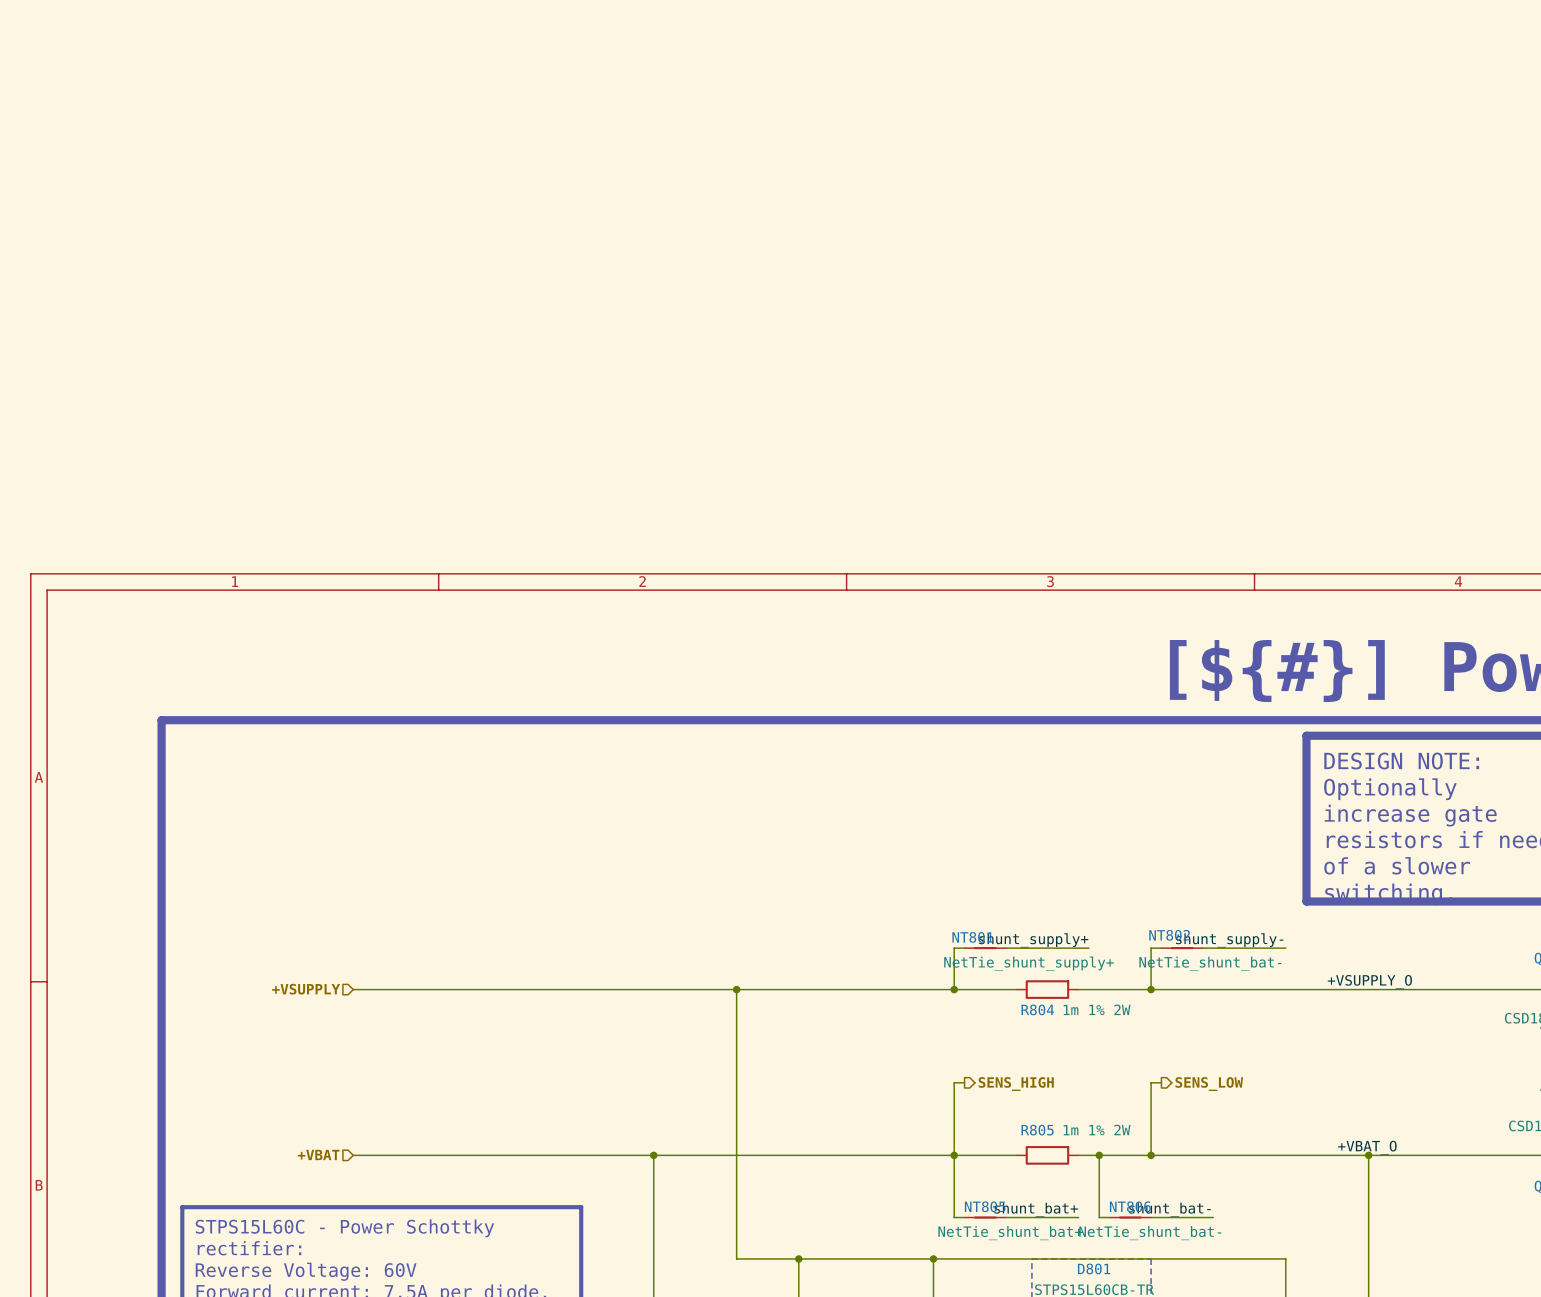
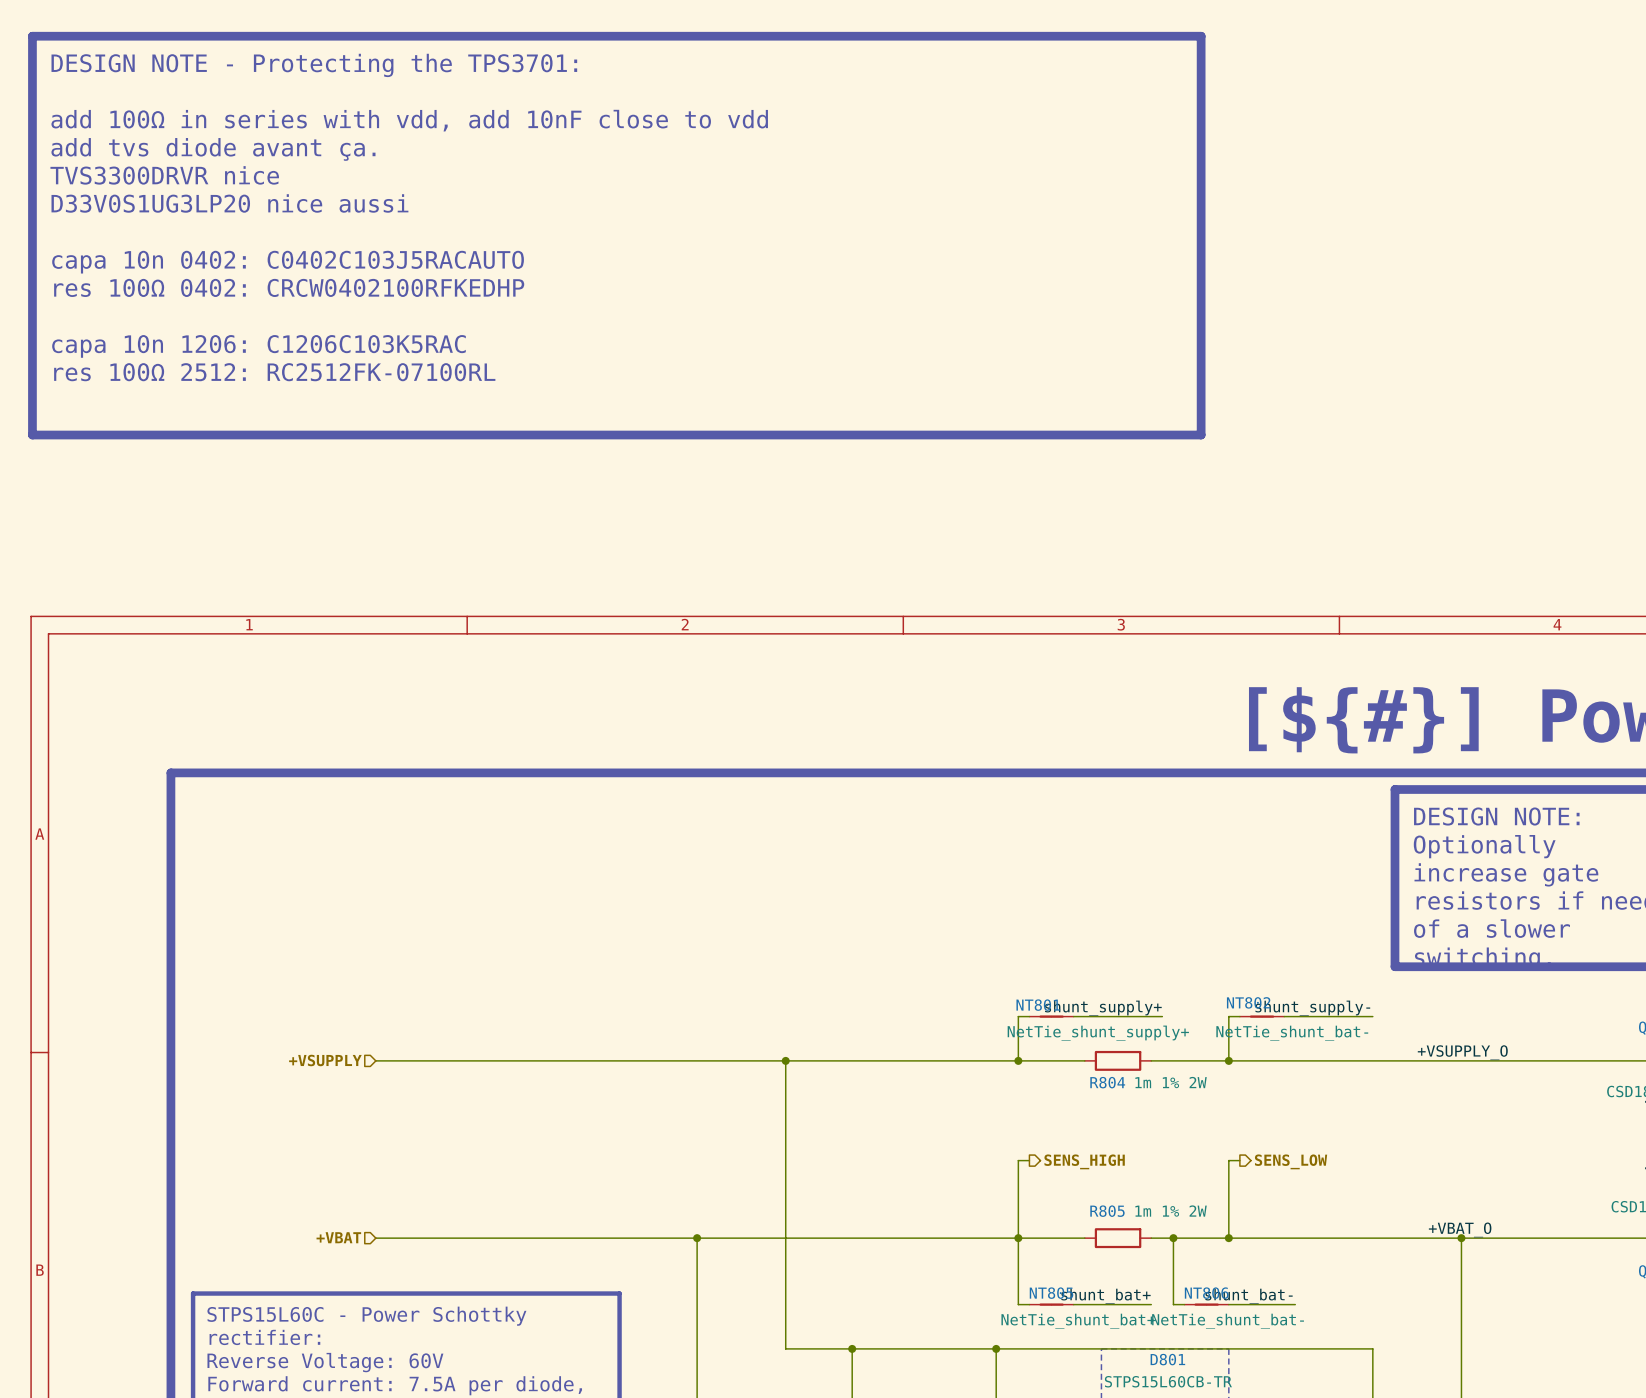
line: none -> (32, 36) (1201, 36) (1201, 435) (32, 435) (32, 36)
text: none -> DESIGN NOTE - Protecting the TPS3701: (314, 65)
text: none -> add 100Ω in series with vdd, add 10nF close to vdd (409, 120)
text: none -> add tvs diode avant ça. (213, 149)
text: none -> TVS3300DRVR nice (164, 175)
text: none -> D33V0S1UG3LP20 nice aussi (229, 203)
text: none -> capa 10n 0402: C0402C103J5RACAUTO (288, 262)
text: none -> res 100Ω 0402: CRCW0402100RFKEDHP (289, 287)
text: none -> capa 10n 1206: C1206C103K5RAC (258, 346)
text: none -> res 100Ω 2512: RC2512FK-07100RL (274, 372)

